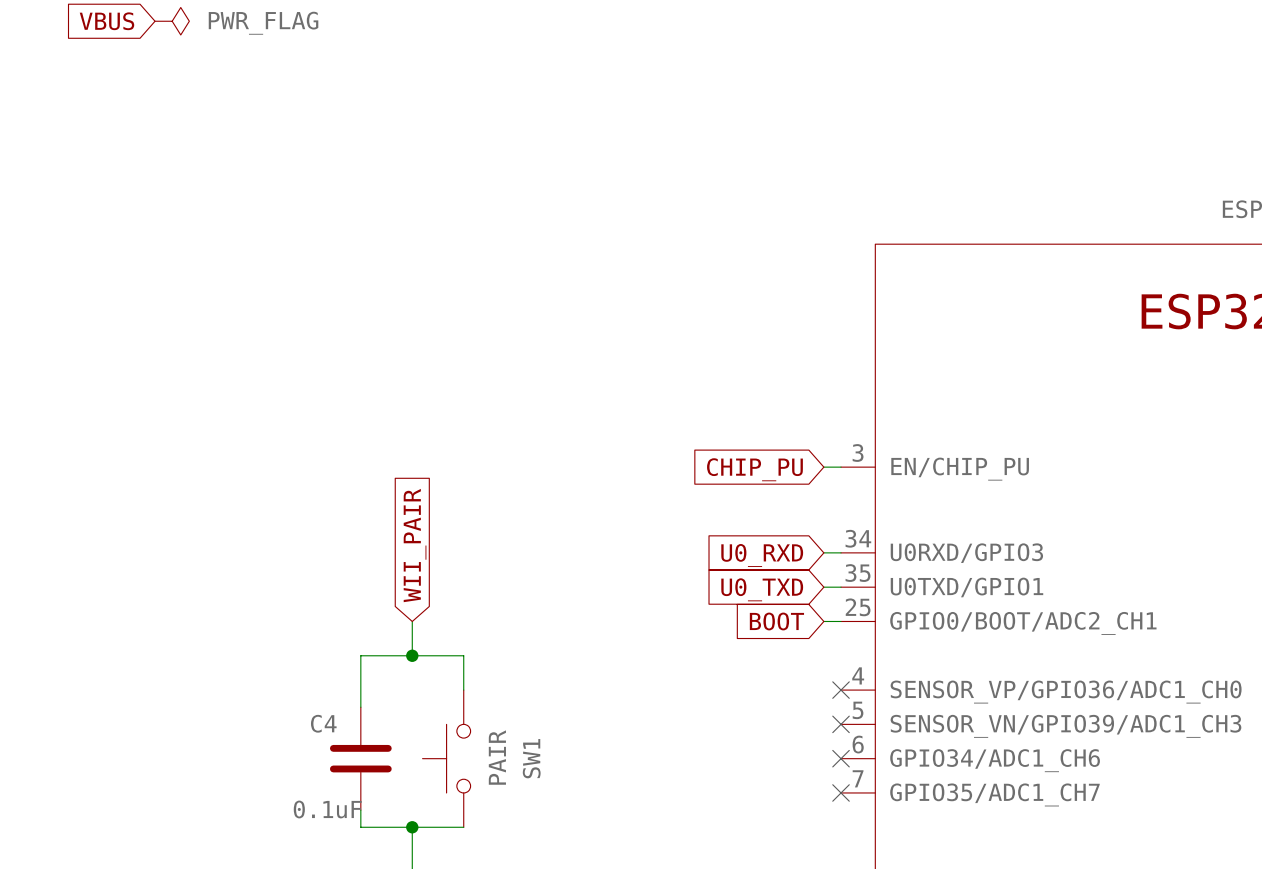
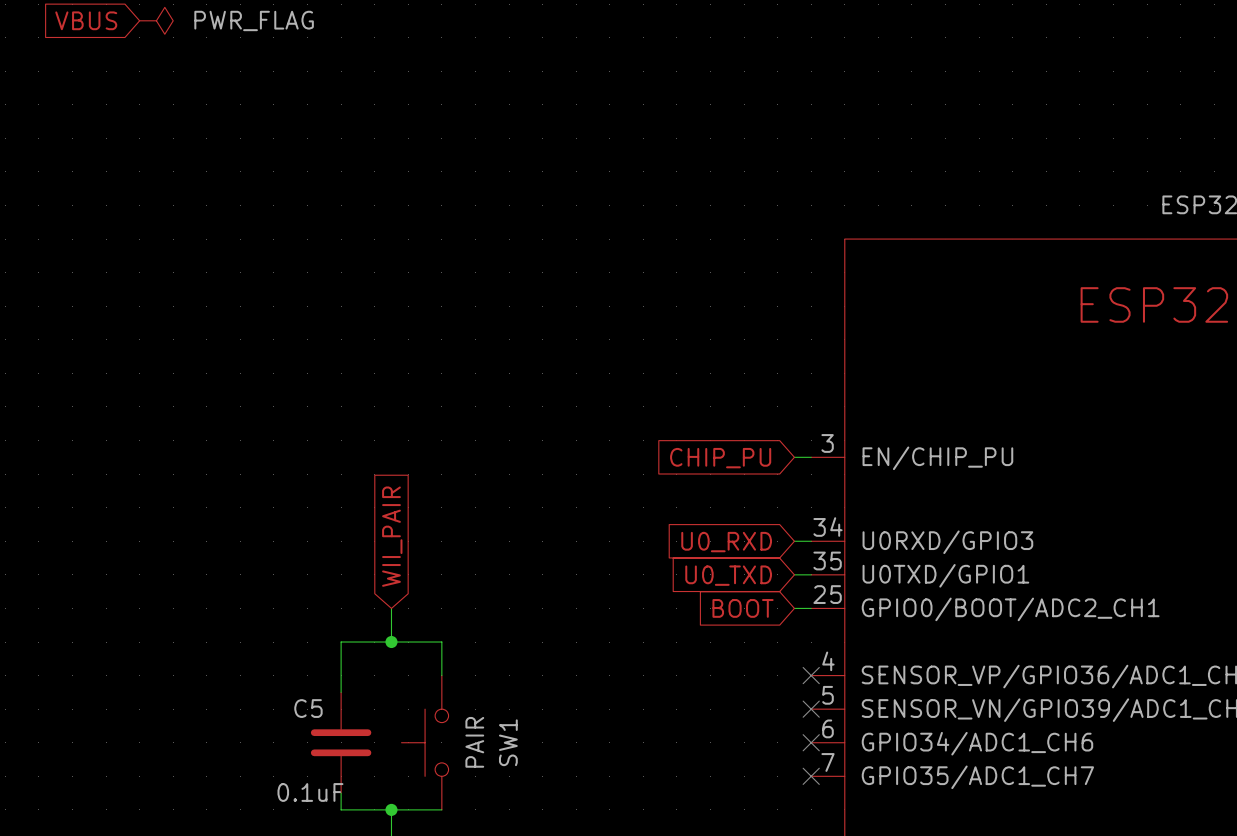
C4 name: C4 (323, 723) -> C5 (308, 708)

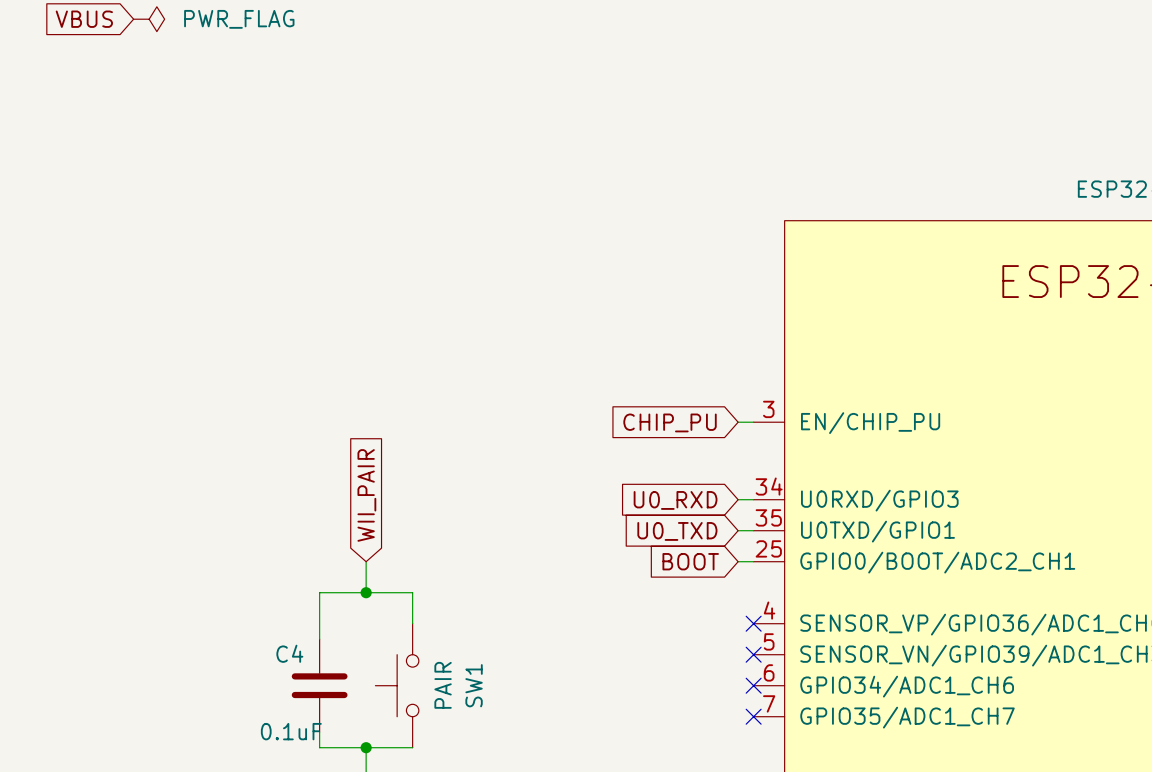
C5 name: C5 (308, 708) -> C4 (289, 653)

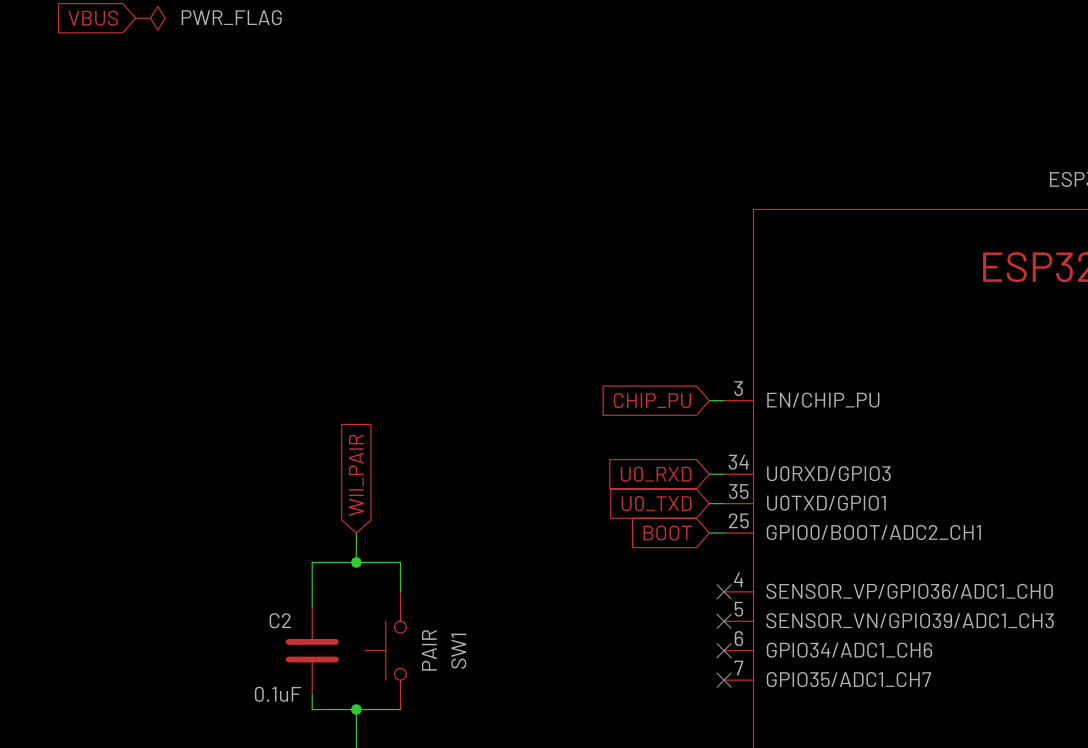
C4 name: C4 (289, 653) -> C2 (280, 620)

